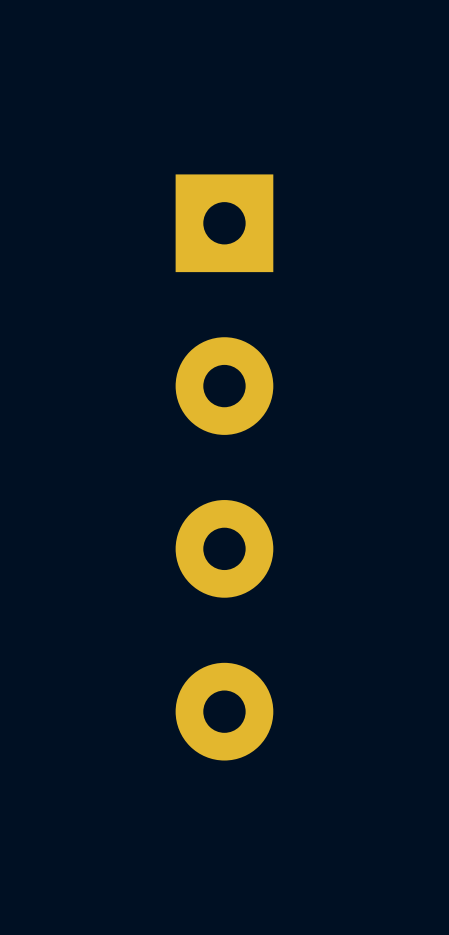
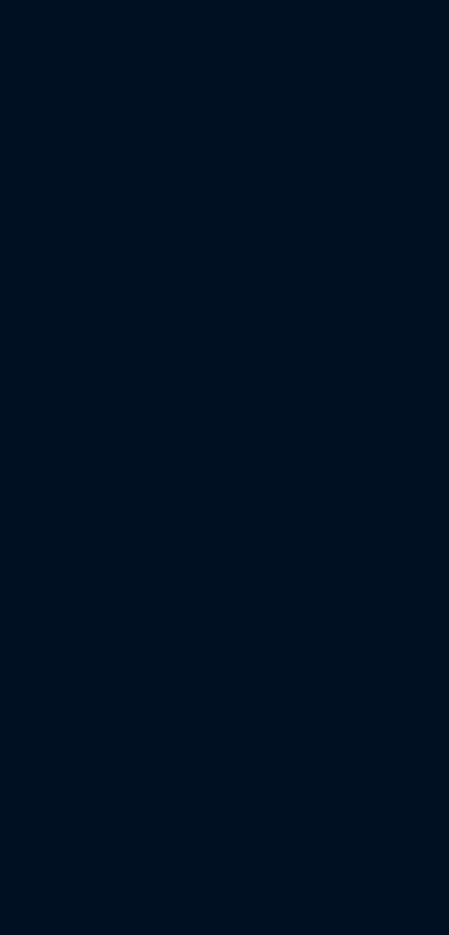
part: (224, 467) -> none

